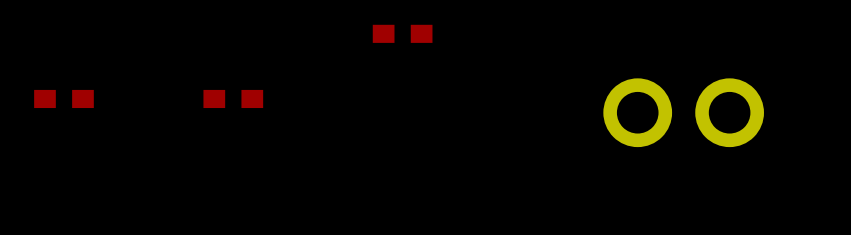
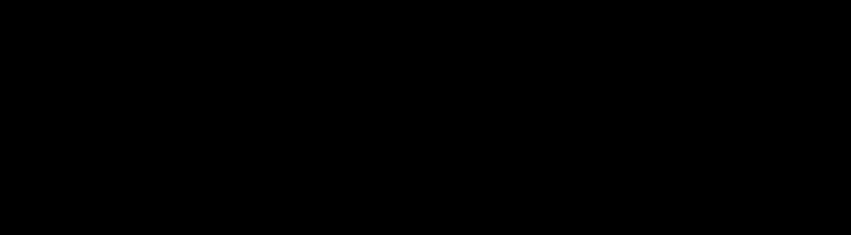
part: (402, 33) -> none
part: (63, 98) -> none
part: (233, 98) -> none
part: (683, 112) -> none

